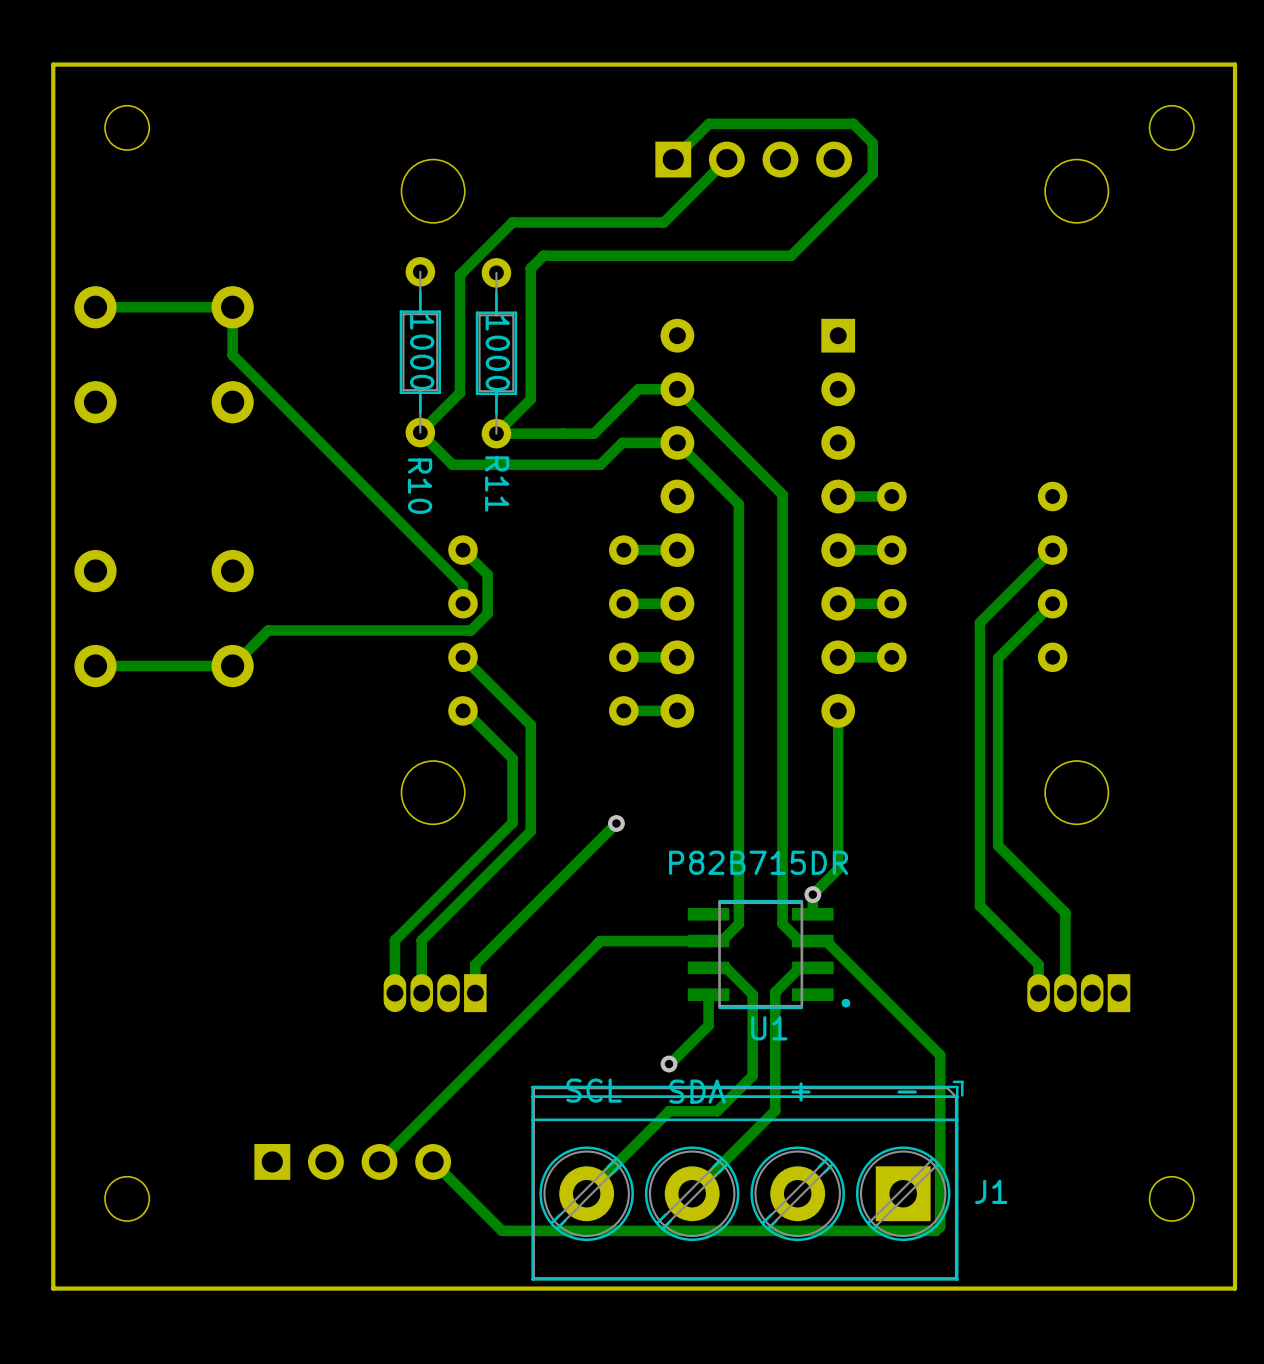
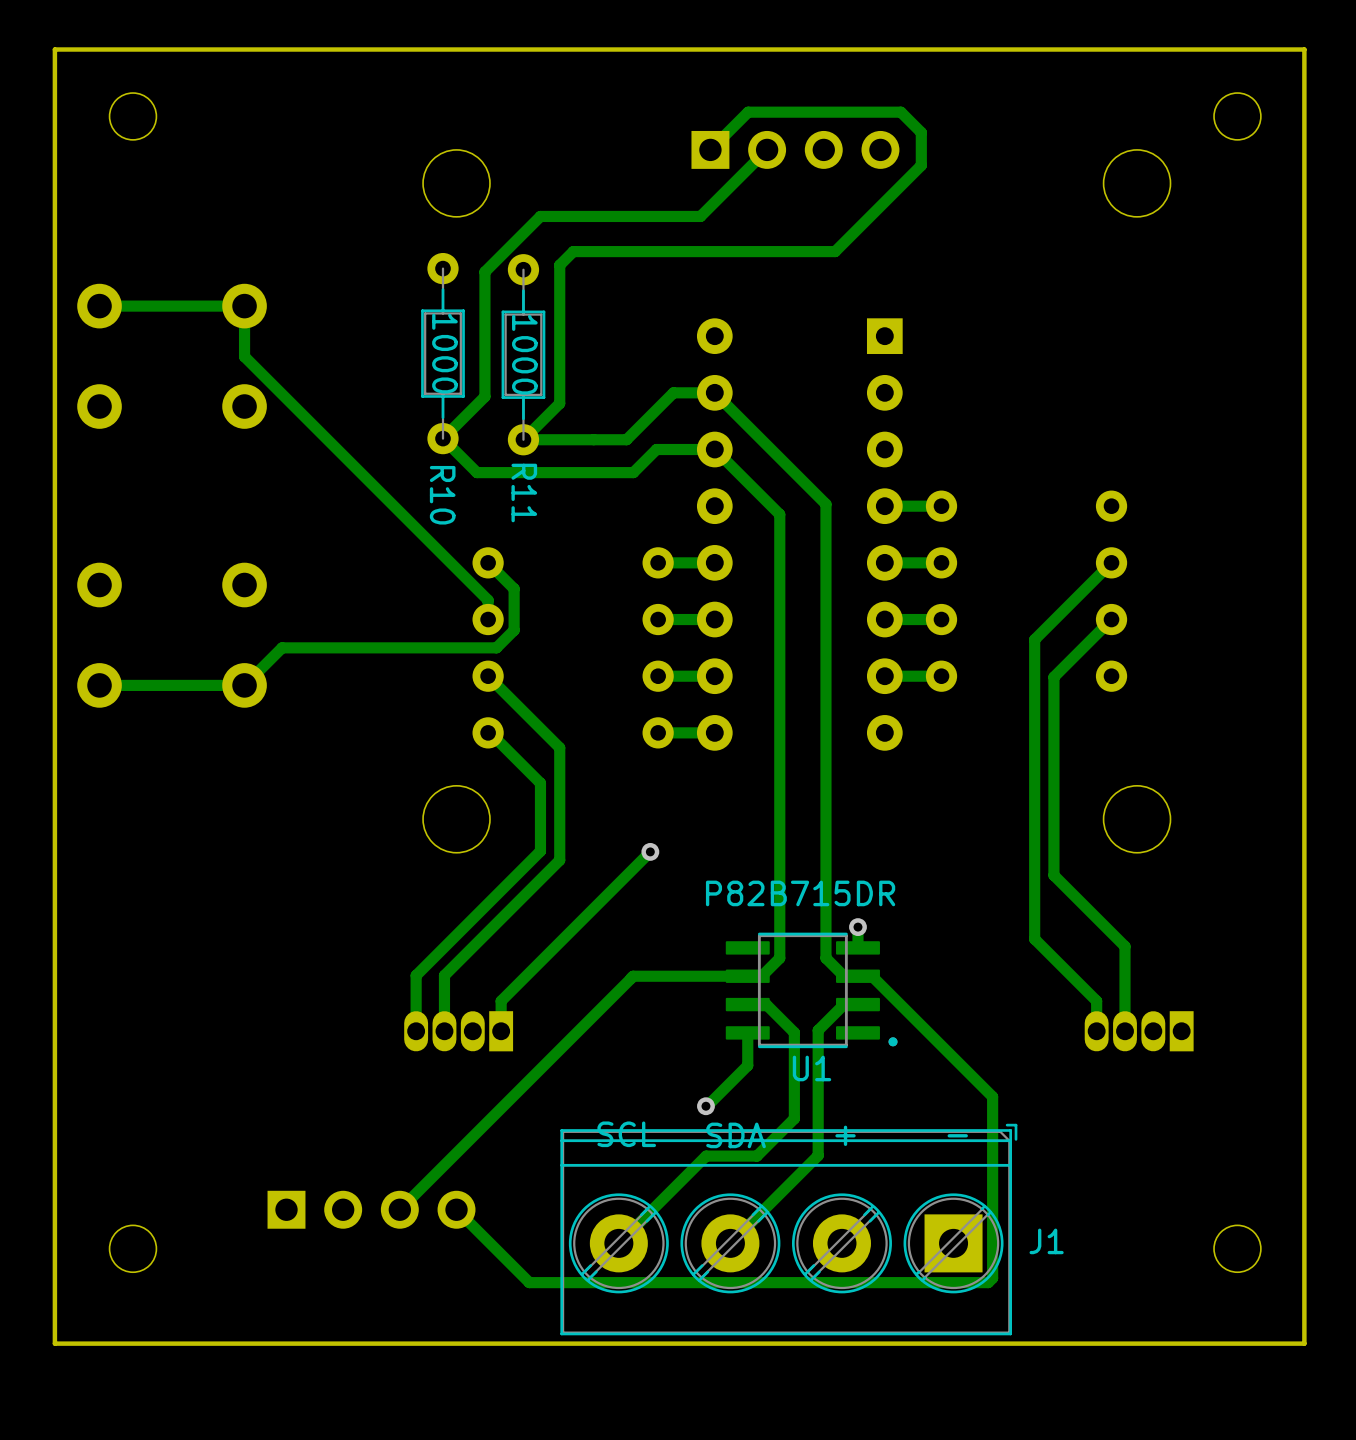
track: (838, 710) (838, 869) (812, 894) -> none

